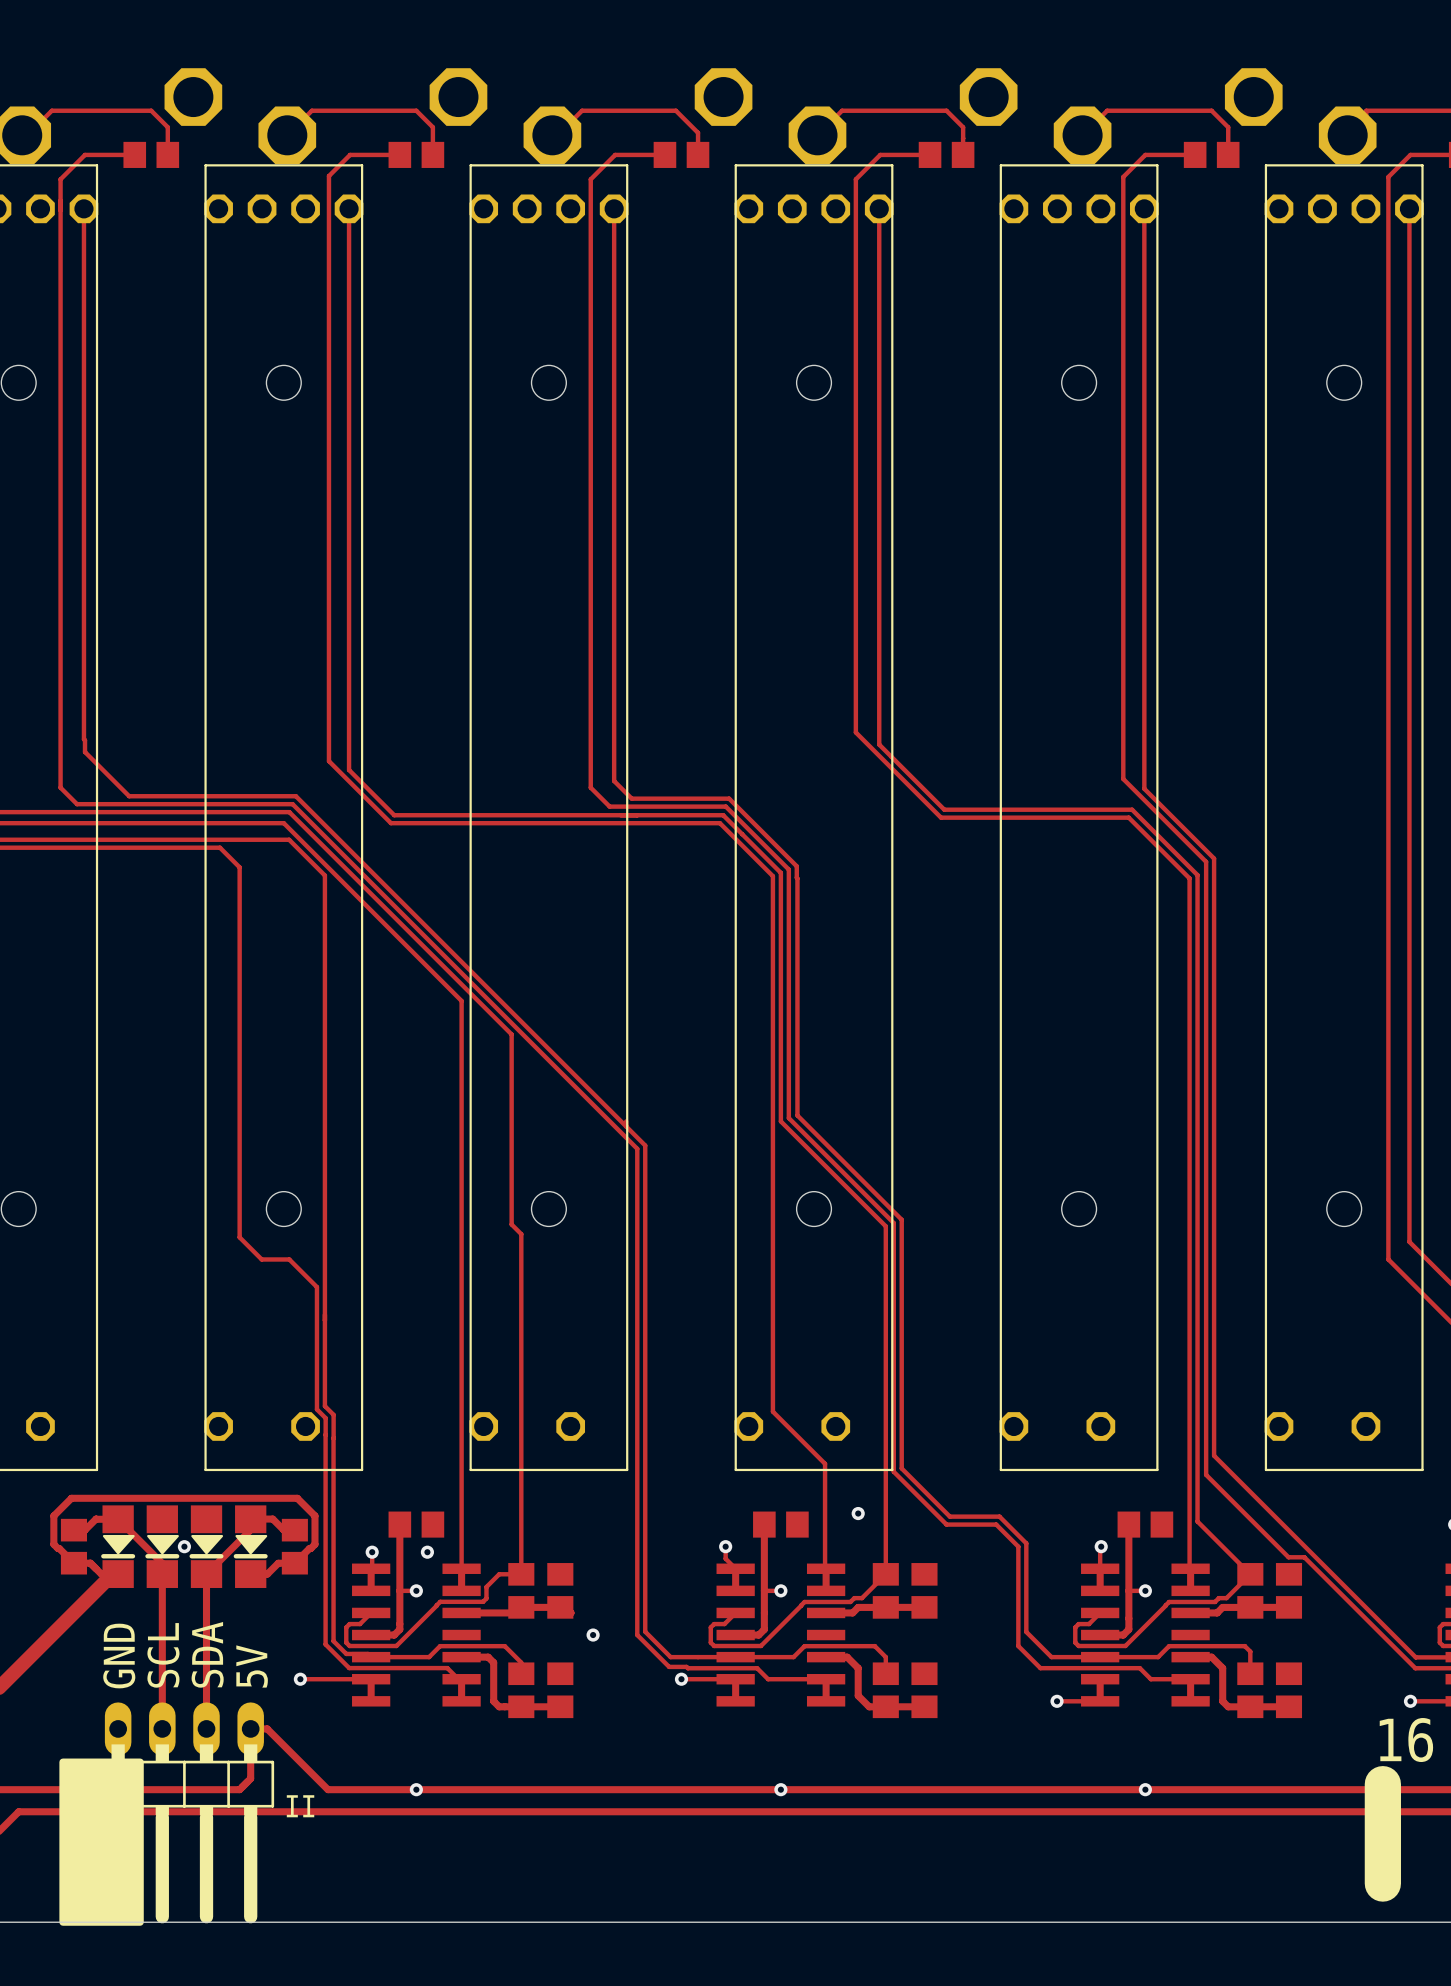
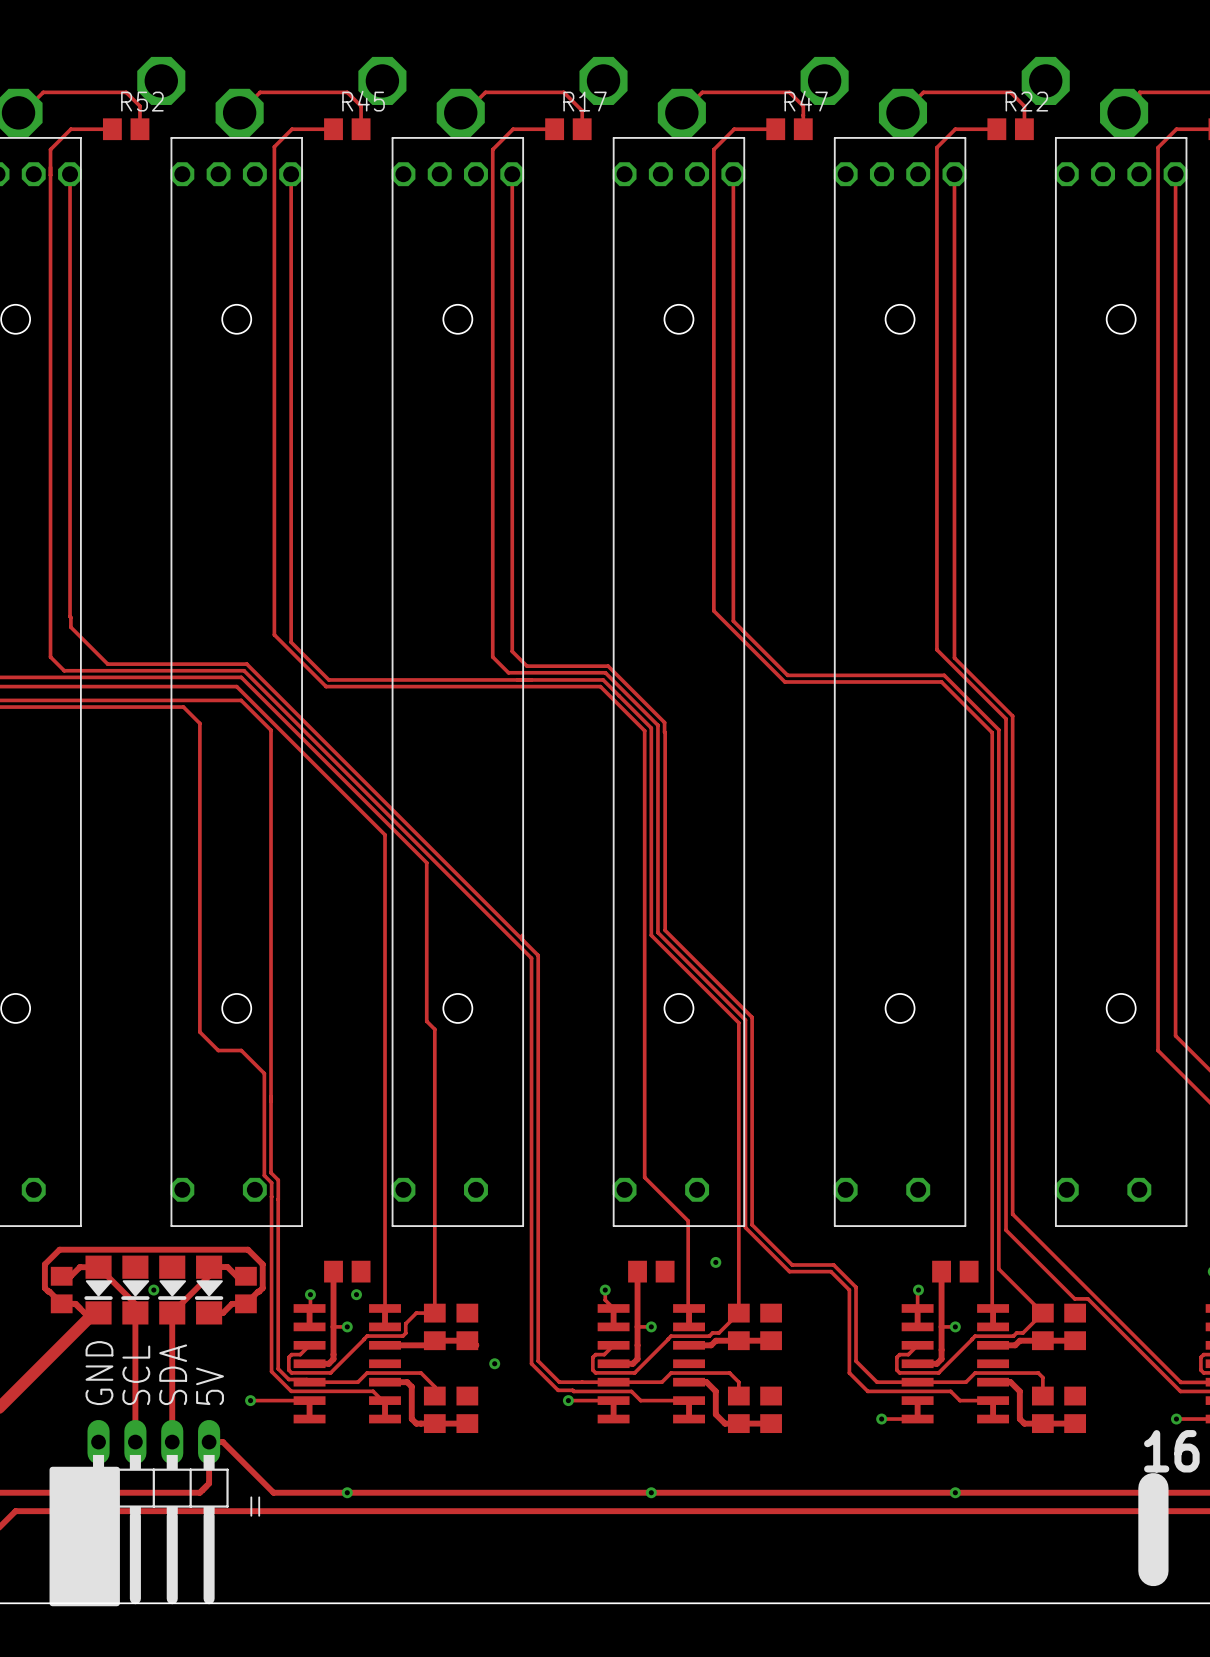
R52 name: none -> R52 (142, 101)
R17 name: none -> R17 (585, 101)
R47 name: none -> R47 (806, 101)
R22 name: none -> R22 (1026, 101)
R45 name: none -> R45 (363, 101)

